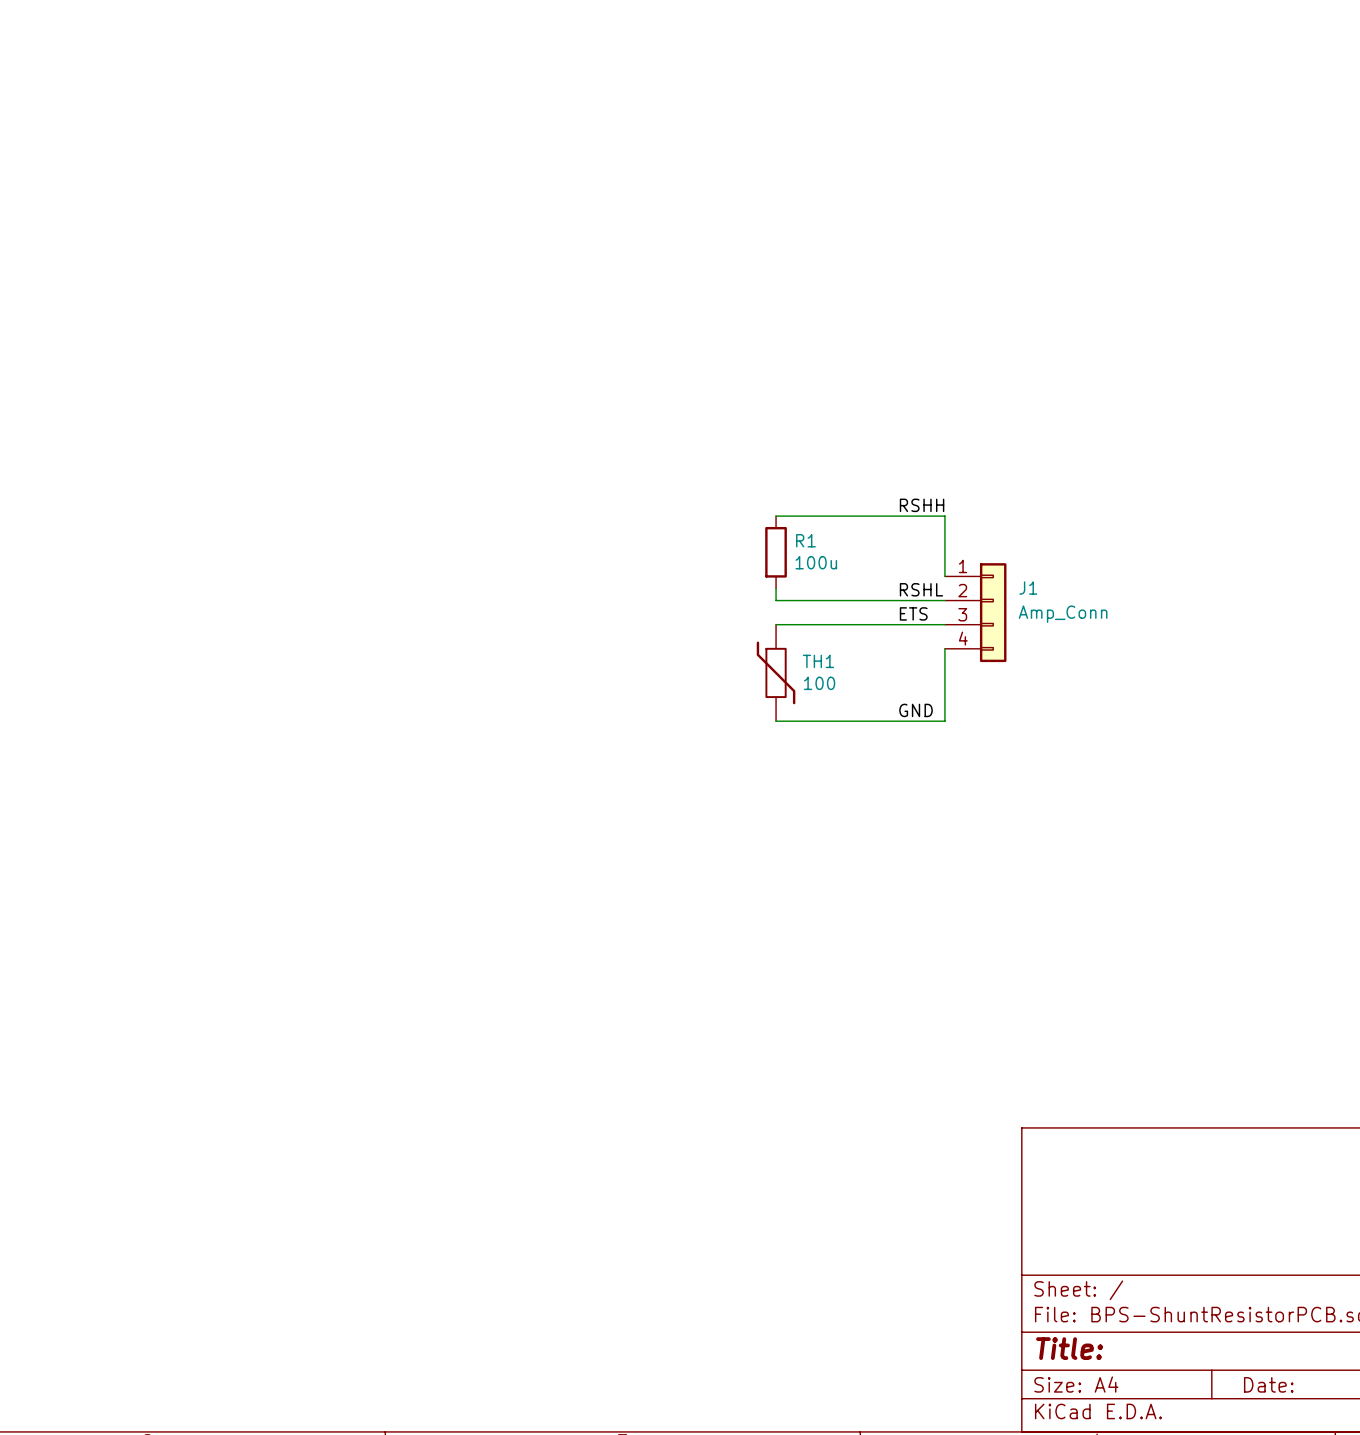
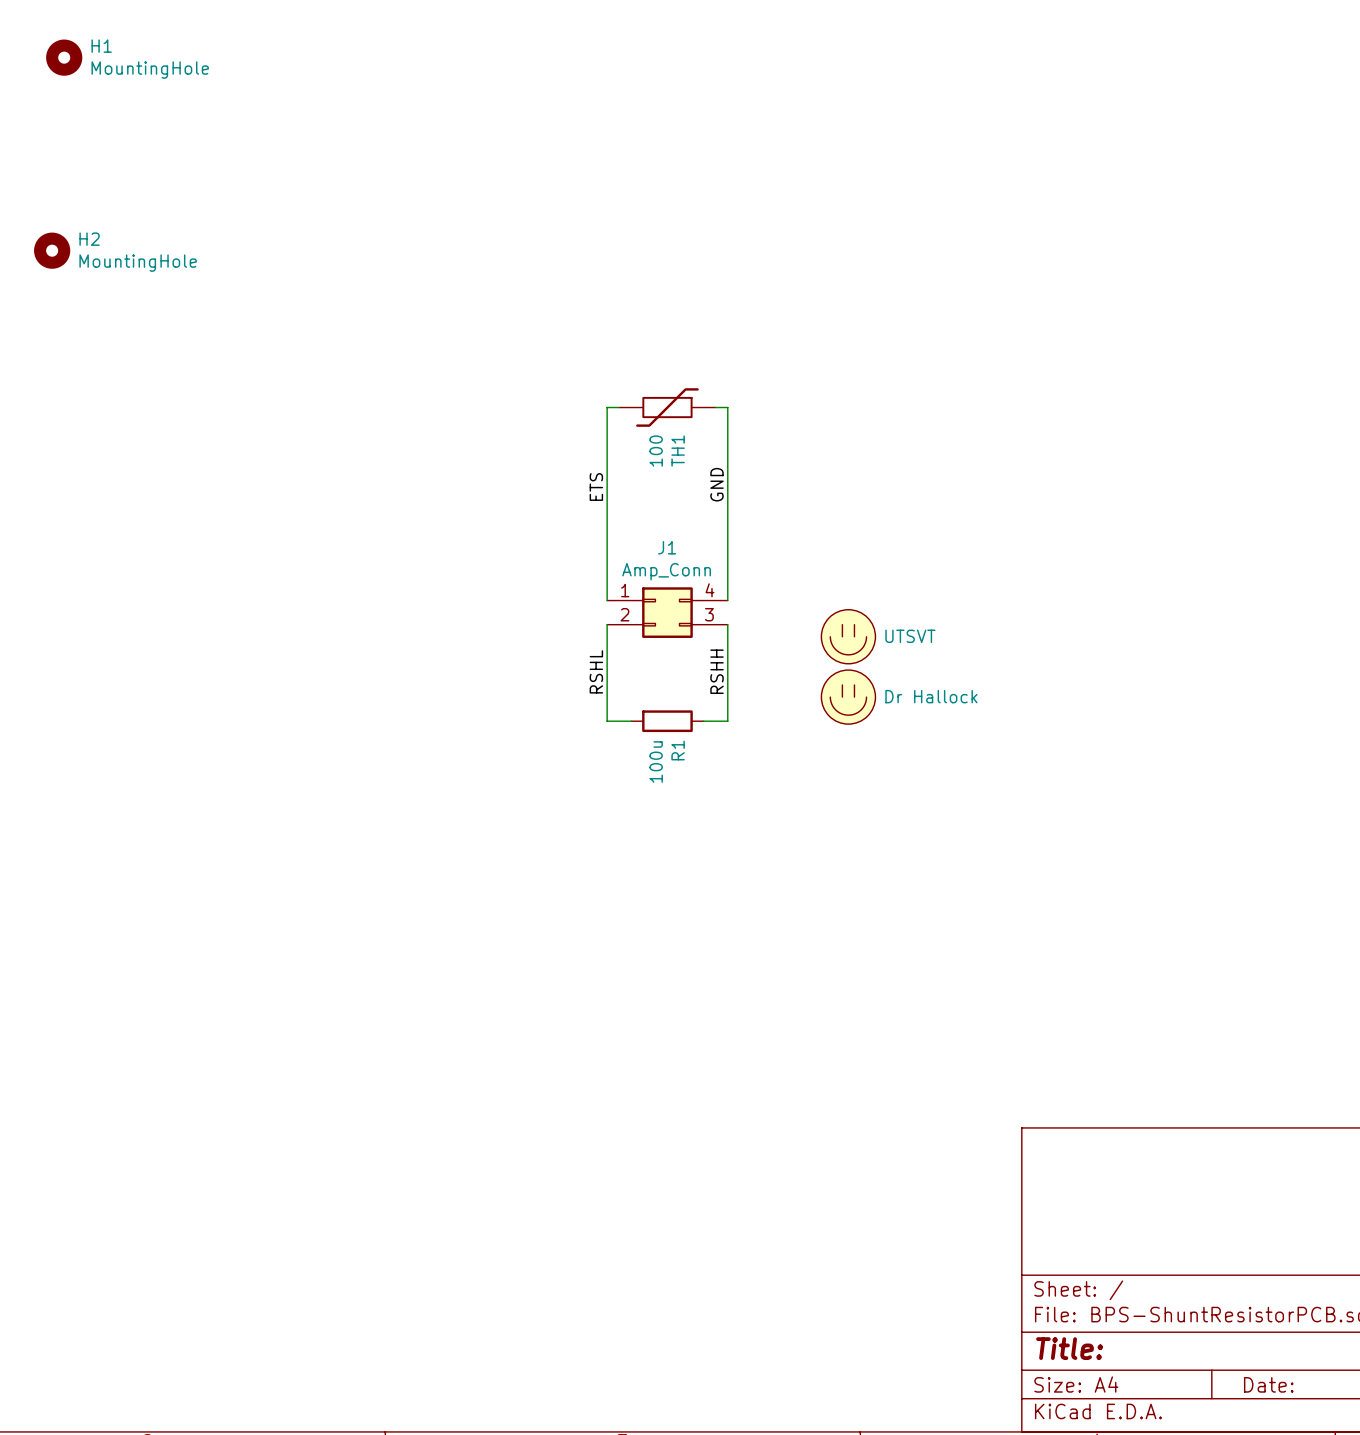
H1: none -> MountingHole (64, 57)
H2: none -> MountingHole (52, 250)
wire: none -> (619, 407) (607, 407) (607, 600)
wire: none -> (715, 407) (727, 407) (727, 600)
label: none -> GND (717, 484)
label: none -> ETS (596, 487)
label: RSHH (922, 505) -> none
wire: (776, 516) (944, 516) (944, 576) -> none
R1 rotation: 0° (776, 552) -> 90° clockwise (667, 721)
R1 position: (776, 552) -> (667, 721)
J1 symbol: [944, 563, 1007, 663] -> [607, 587, 728, 638]
wire: (776, 588) (776, 600) (944, 600) -> none
J1 name position: J1 (1028, 588) -> J1 (667, 547)
label: RSHL (921, 589) -> none
label: ETS (913, 613) -> none
J1 value position: Amp_Conn (1063, 614) -> Amp_Conn (666, 571)
wire: none -> (607, 624) (607, 721) (631, 721)
wire: none -> (727, 624) (727, 721) (703, 721)
wire: (776, 624) (944, 624) -> none
part: none -> UTSVT (848, 636)
wire: (944, 648) (944, 721) (776, 721) -> none
label: none -> RSHL (596, 671)
label: none -> RSHH (717, 671)
TH1 rotation: 0° (776, 672) -> 90° clockwise (667, 407)
TH1 position: (776, 672) -> (667, 407)
part: none -> Dr Hallock (848, 697)
label: GND (916, 710) -> none

